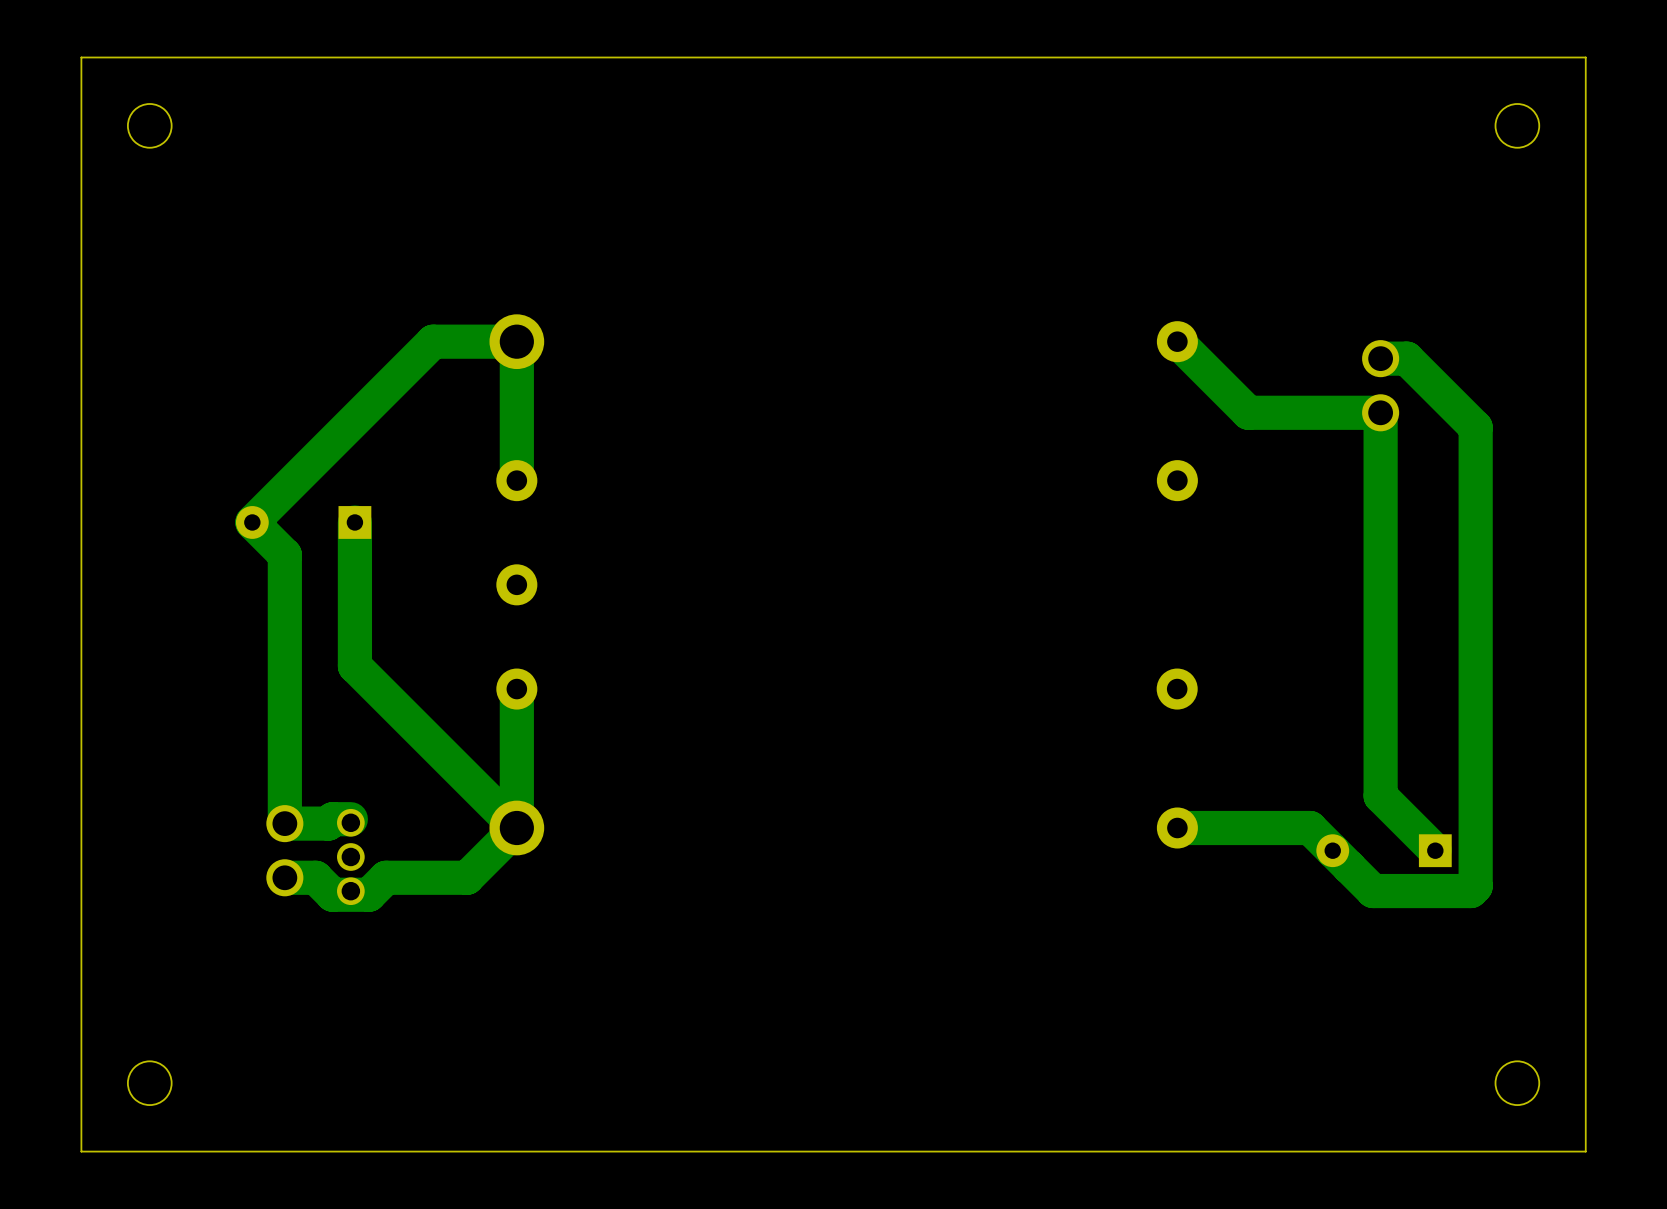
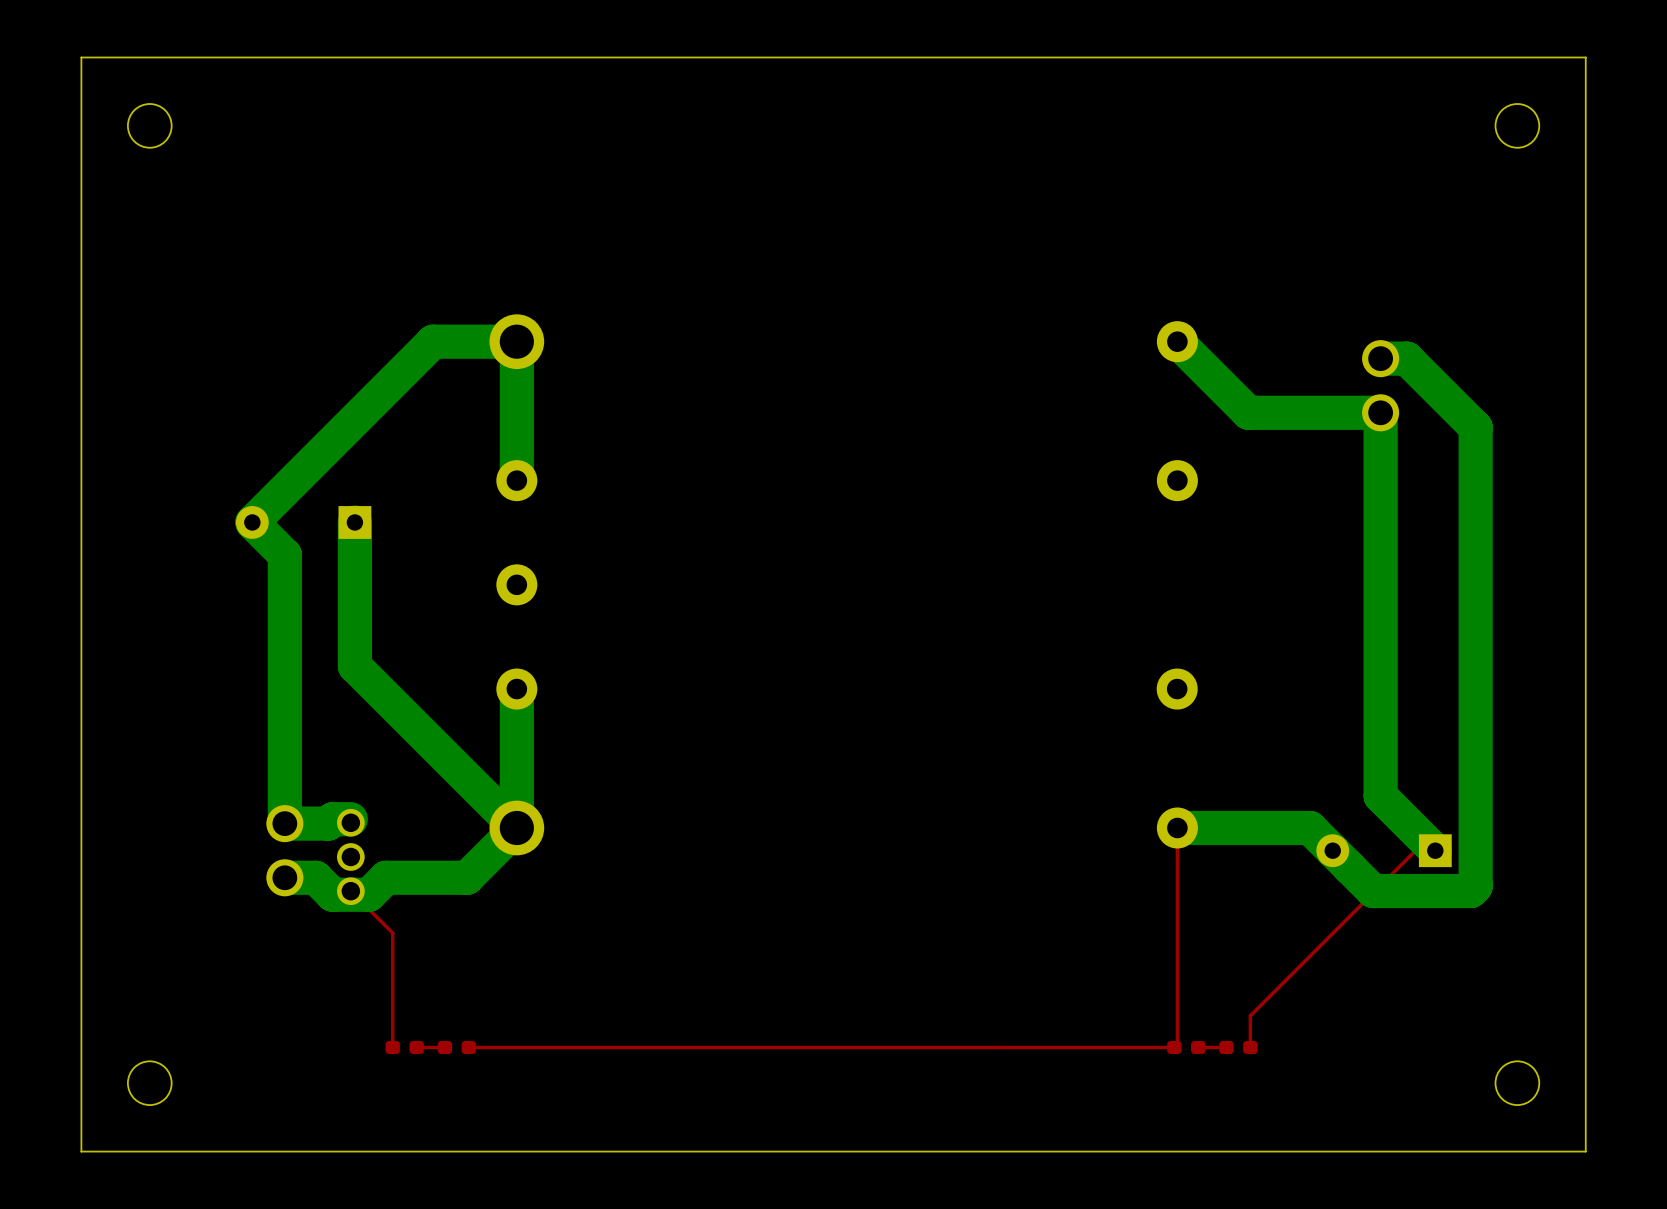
top track: none -> (1177, 828) (1177, 1044) (1174, 1047) (468, 1047)
top track: none -> (1435, 850) (1415, 850) (1250, 1015) (1250, 1047)
top track: none -> (350, 891) (392, 933) (392, 1047)
part: none -> (404, 1047)
top track: none -> (444, 1047) (416, 1047)
part: none -> (456, 1047)
part: none -> (1186, 1047)
top track: none -> (1226, 1047) (1198, 1047)
part: none -> (1238, 1047)

